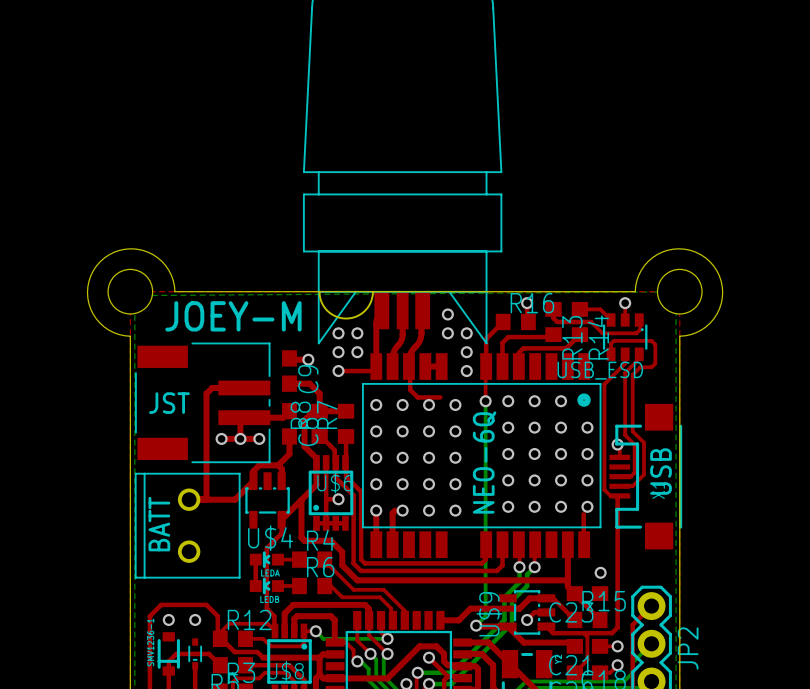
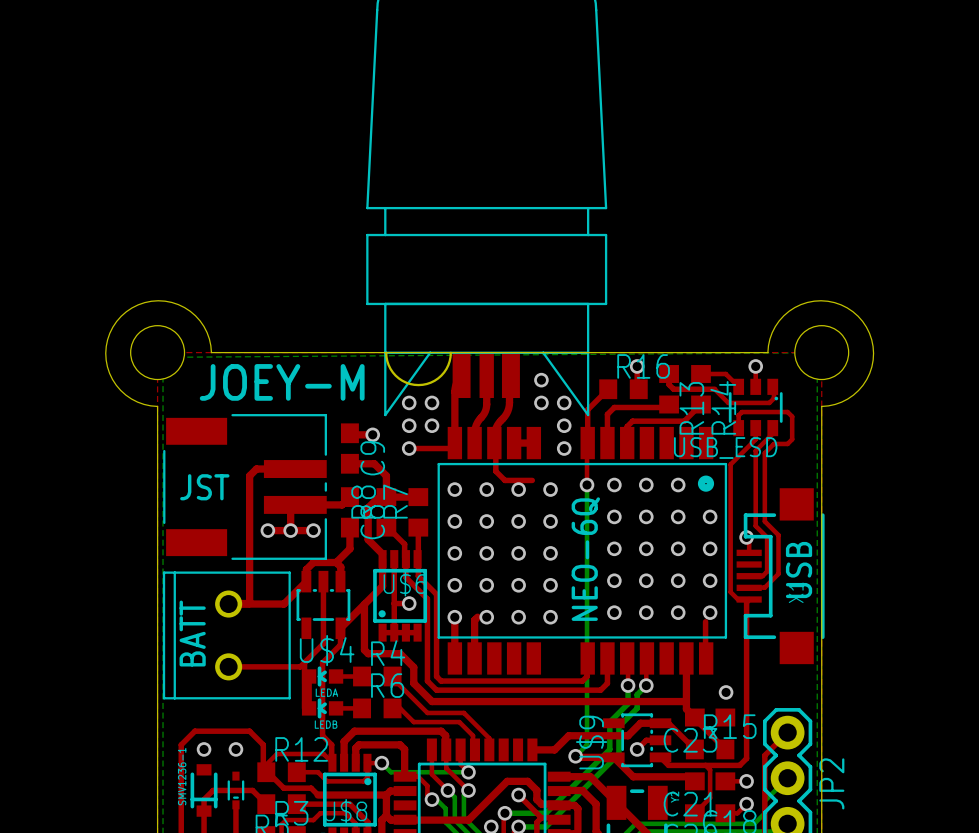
top track: none -> (323, 581) (323, 643) (300, 666) (228, 666)
top track: none -> (304, 662) (304, 708)

